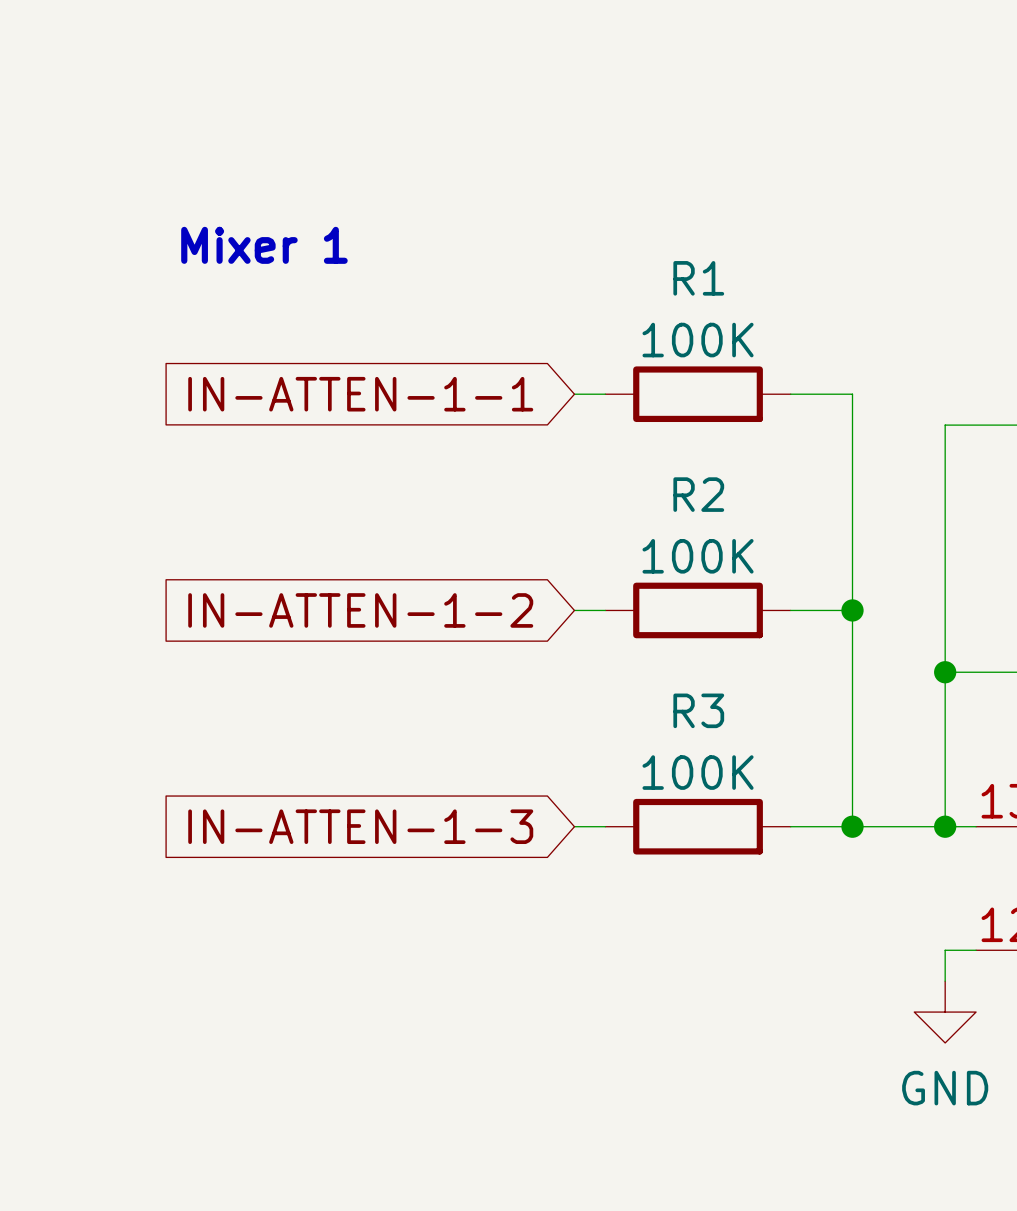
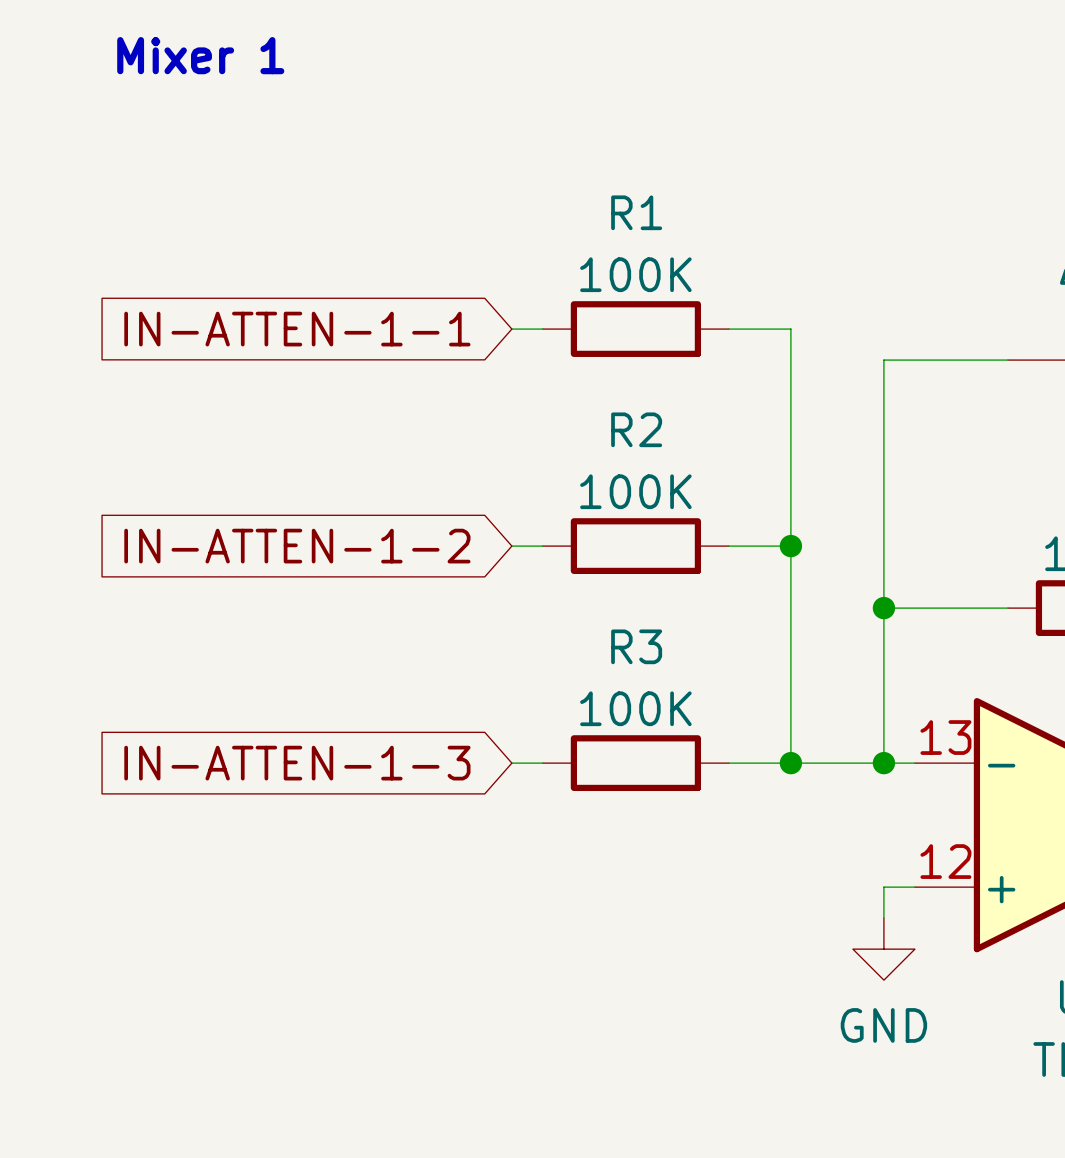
text position: Mixer 1 (264, 245) -> Mixer 1 (200, 55)

